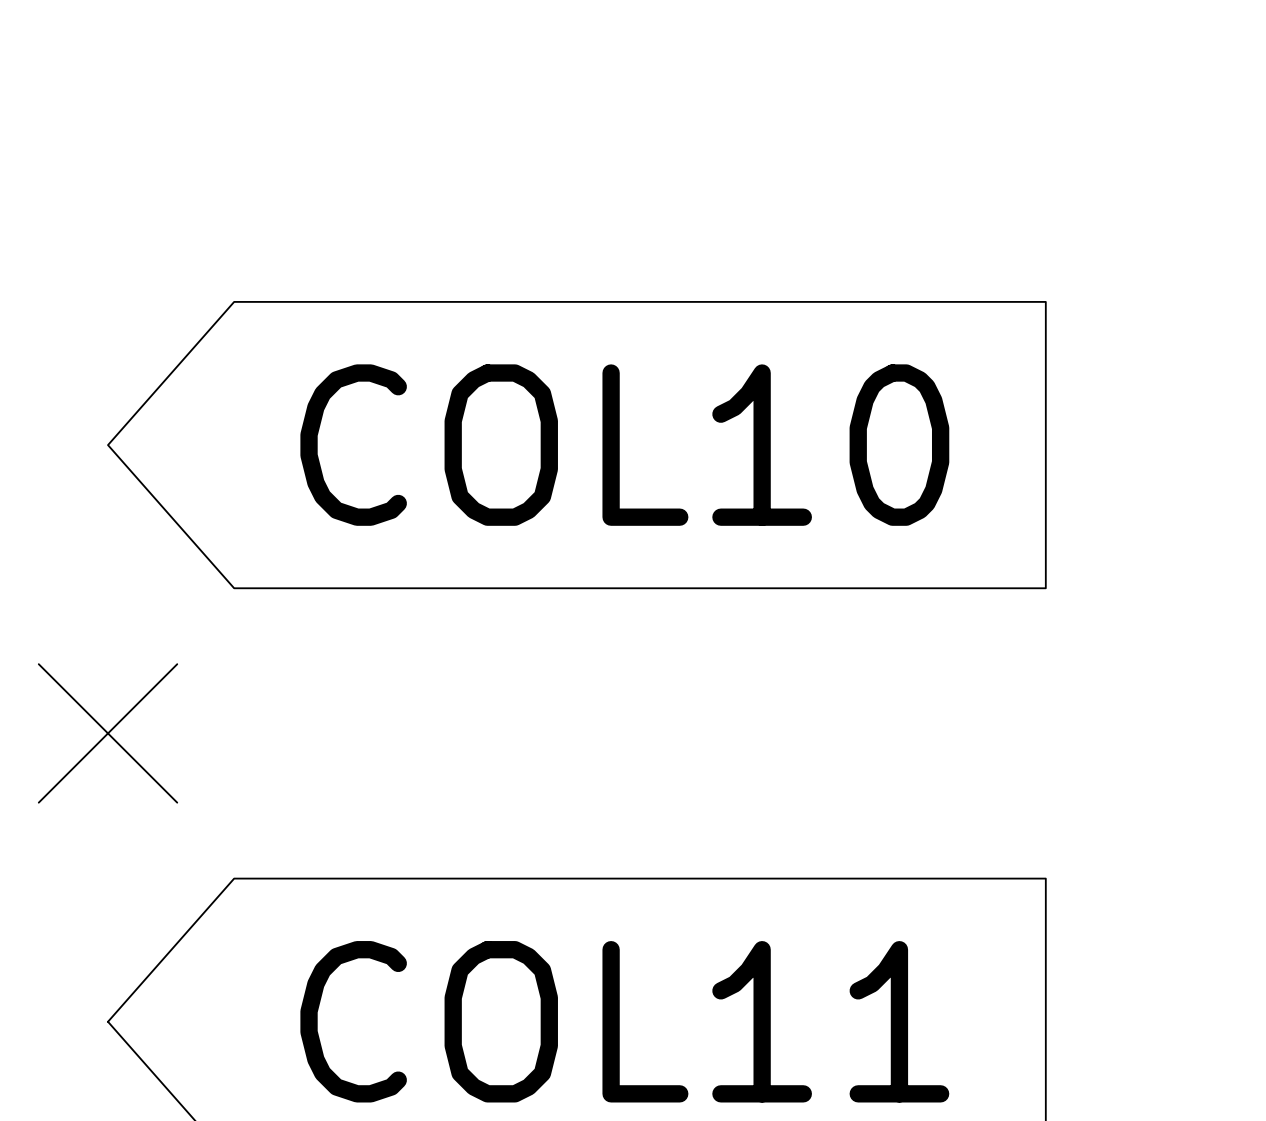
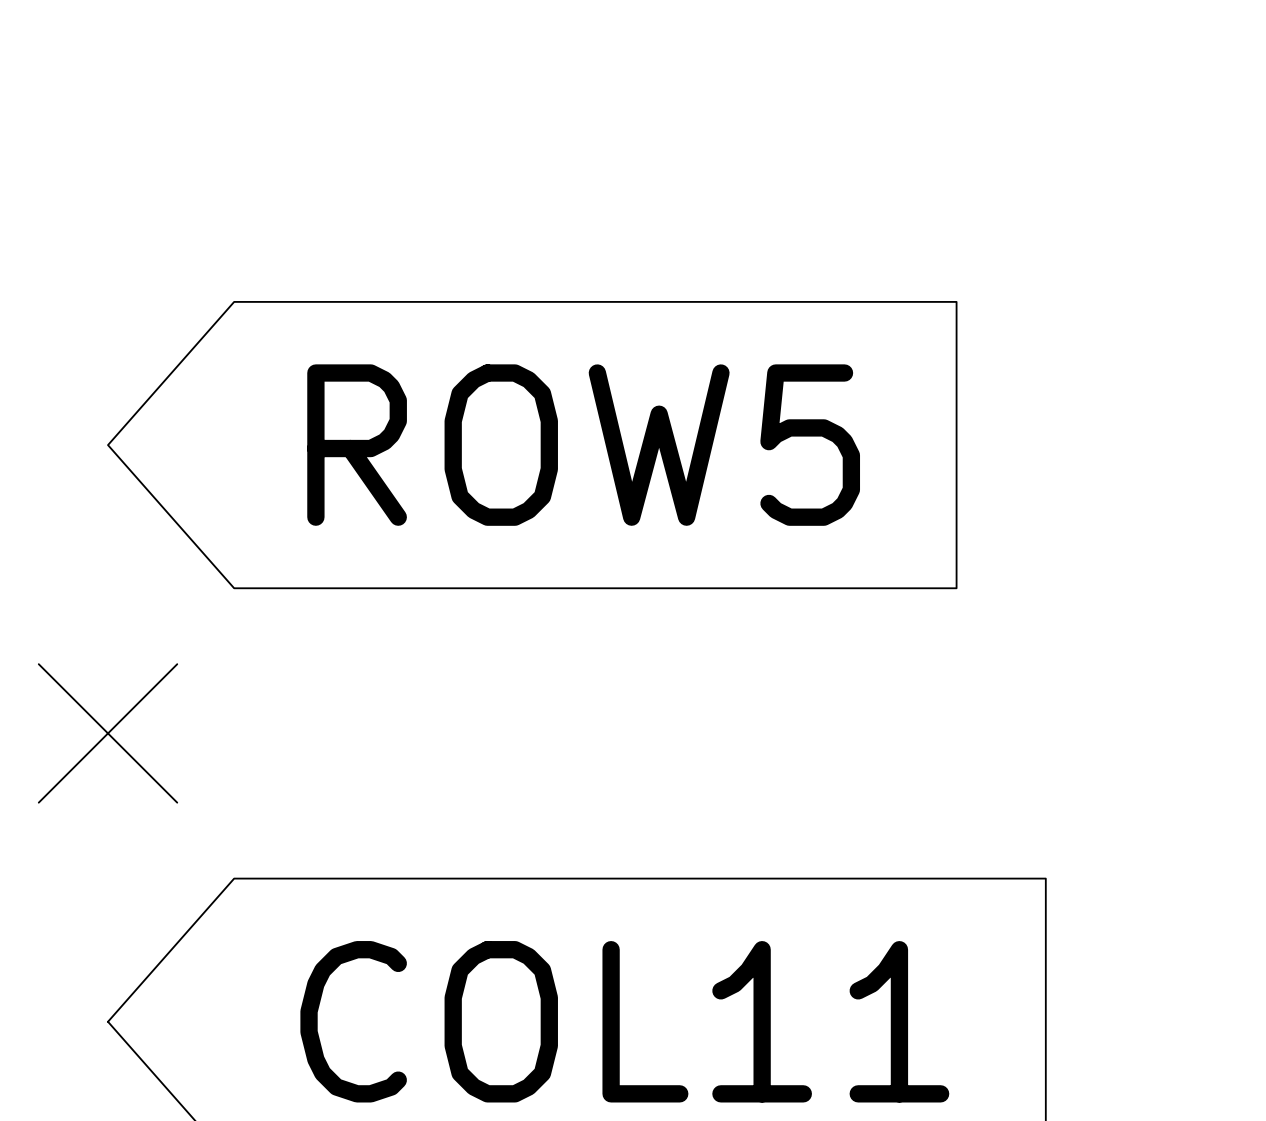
global label: COL10 (624, 445) -> ROW5 (583, 445)

